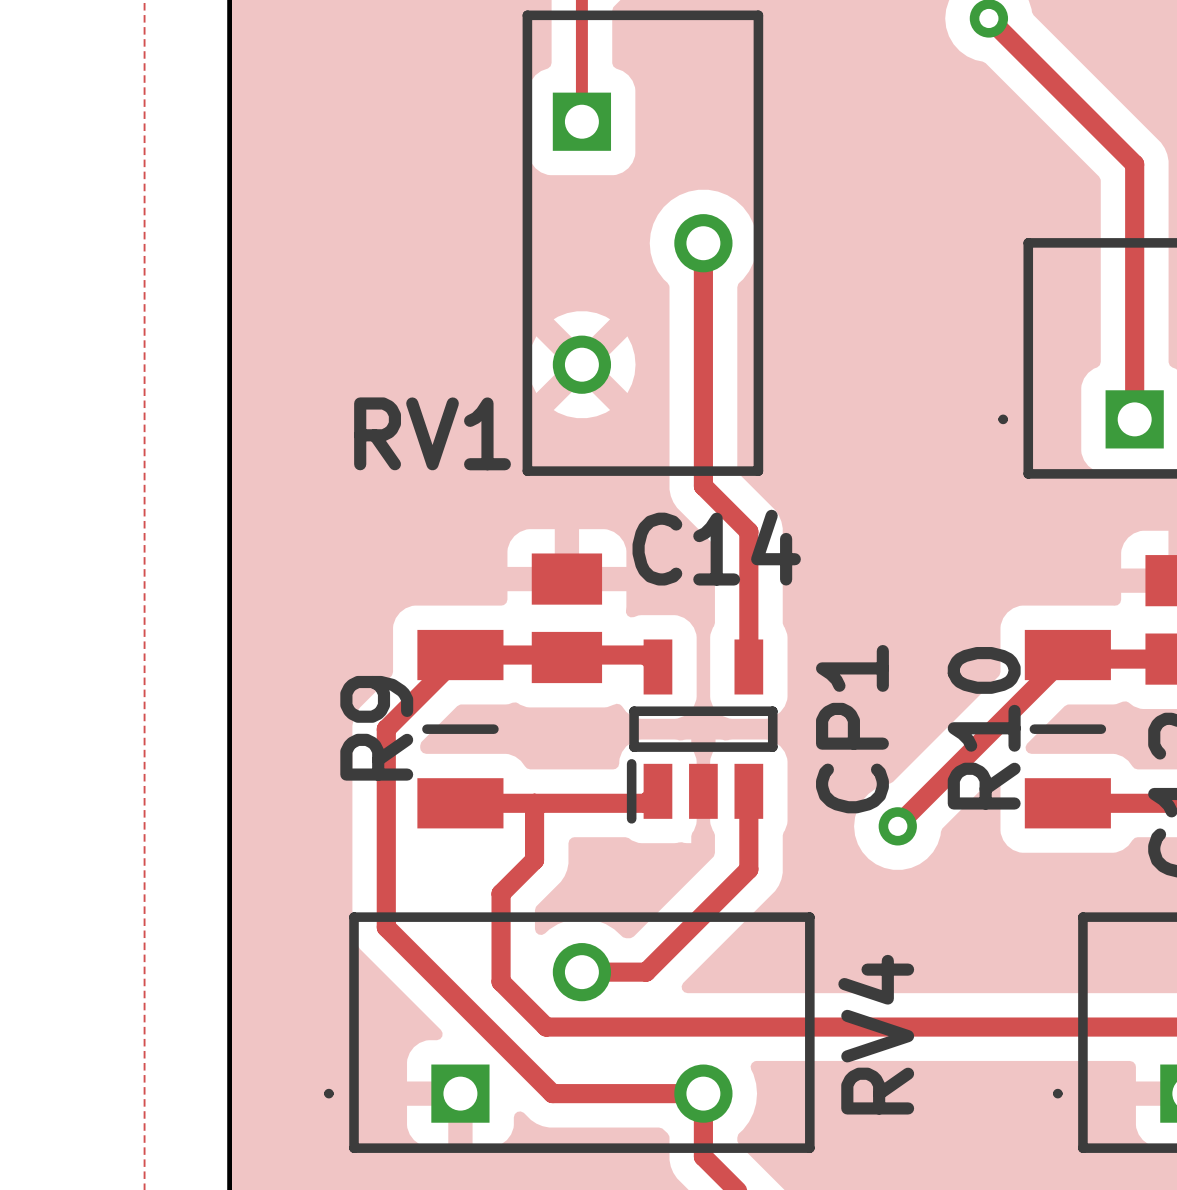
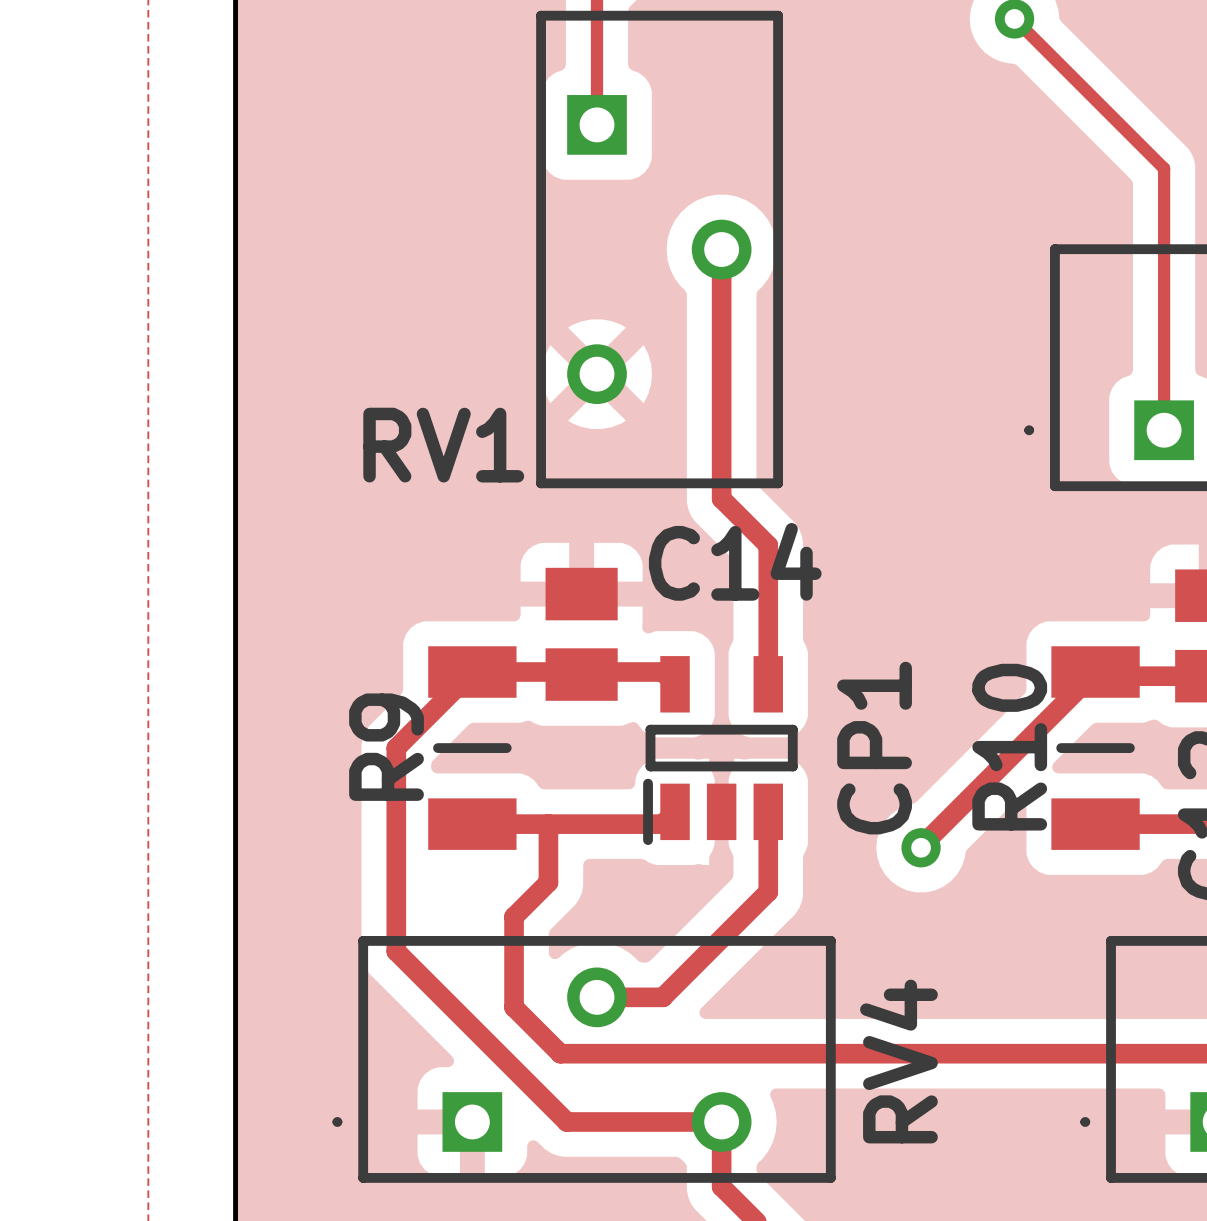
track width: thick (988, 18) (1134, 164) (1134, 419) -> thin (1014, 18) (1164, 168) (1164, 430)

